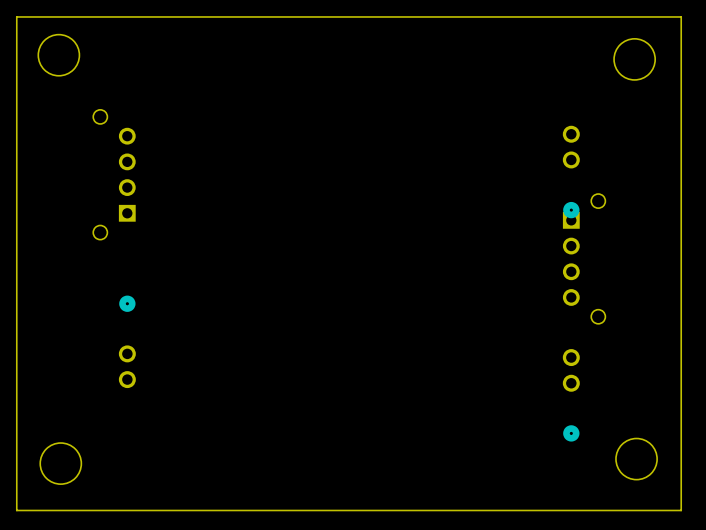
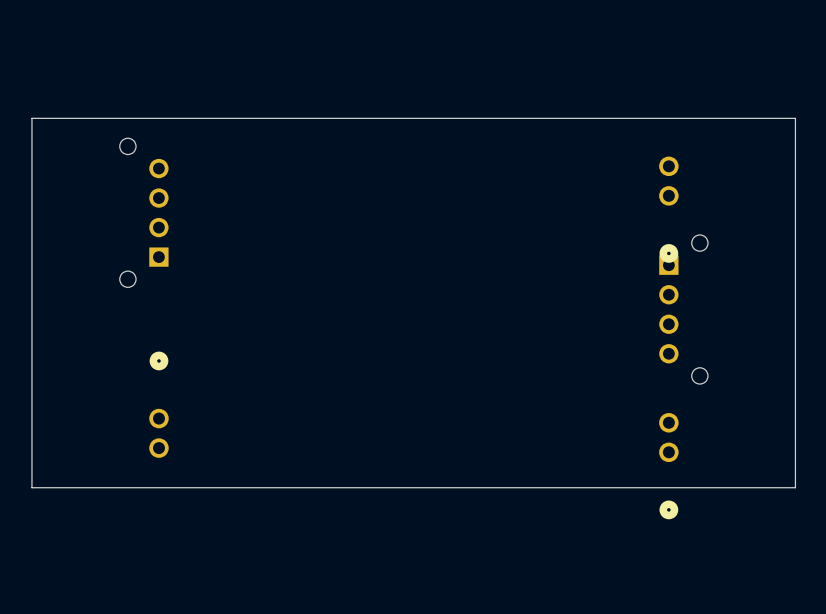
round board edge: [37, 34, 80, 77] -> none
round board edge: [613, 38, 656, 81] -> none
board edge: (16, 92) (16, 16) (681, 16) (681, 510) (16, 510) (16, 414) -> (31, 118) (795, 118) (795, 487) (31, 487)
round board edge: [615, 438, 658, 480] -> none
round board edge: [39, 442, 82, 485] -> none

